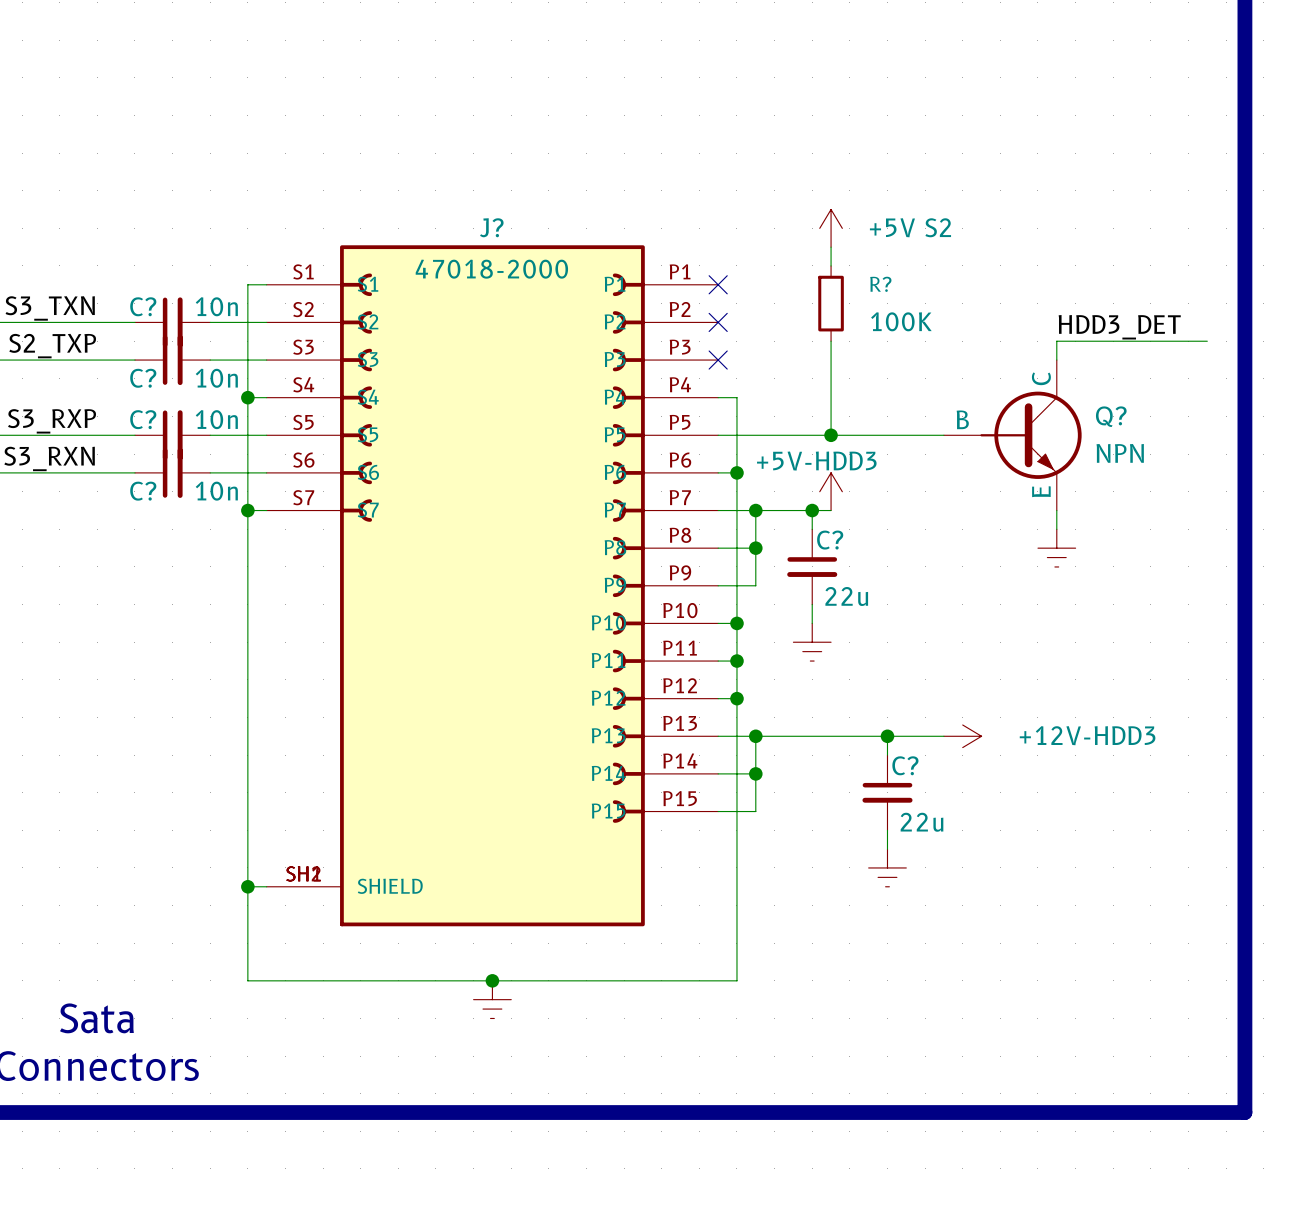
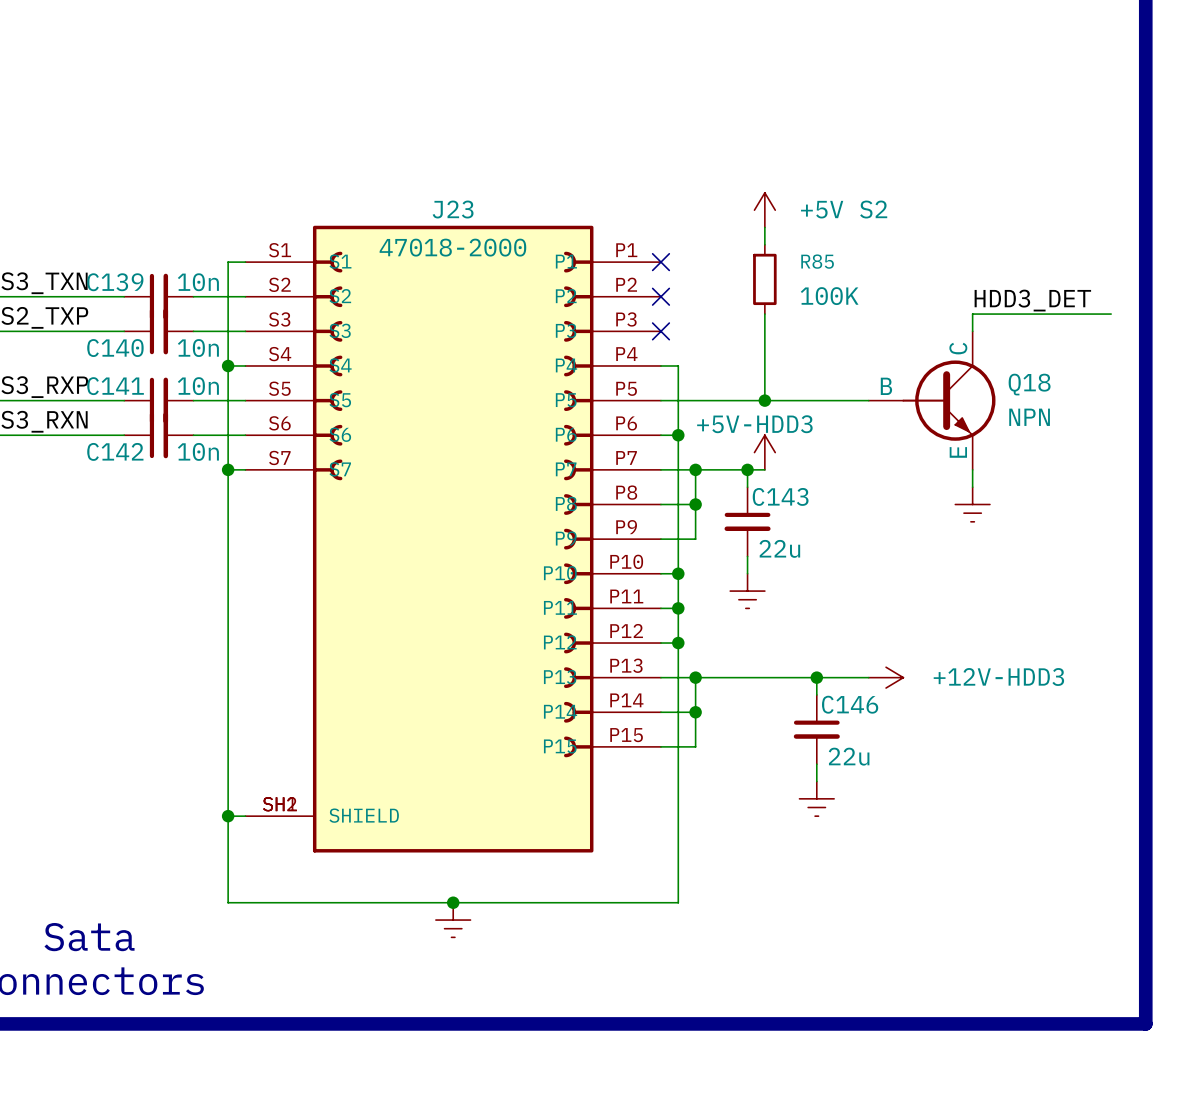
J? name: J? (491, 227) -> J23 (453, 209)
R? name: R? (880, 284) -> R85 (817, 261)
C? name: C? (143, 306) -> C139 (115, 282)
C? name: C? (143, 378) -> C140 (115, 348)
Q? name: Q? (1111, 416) -> Q18 (1029, 384)
C? name: C? (143, 419) -> C141 (115, 386)
C? name: C? (143, 491) -> C142 (115, 451)
C? name: C? (830, 540) -> C143 (780, 496)
C? name: C? (905, 765) -> C146 (850, 704)

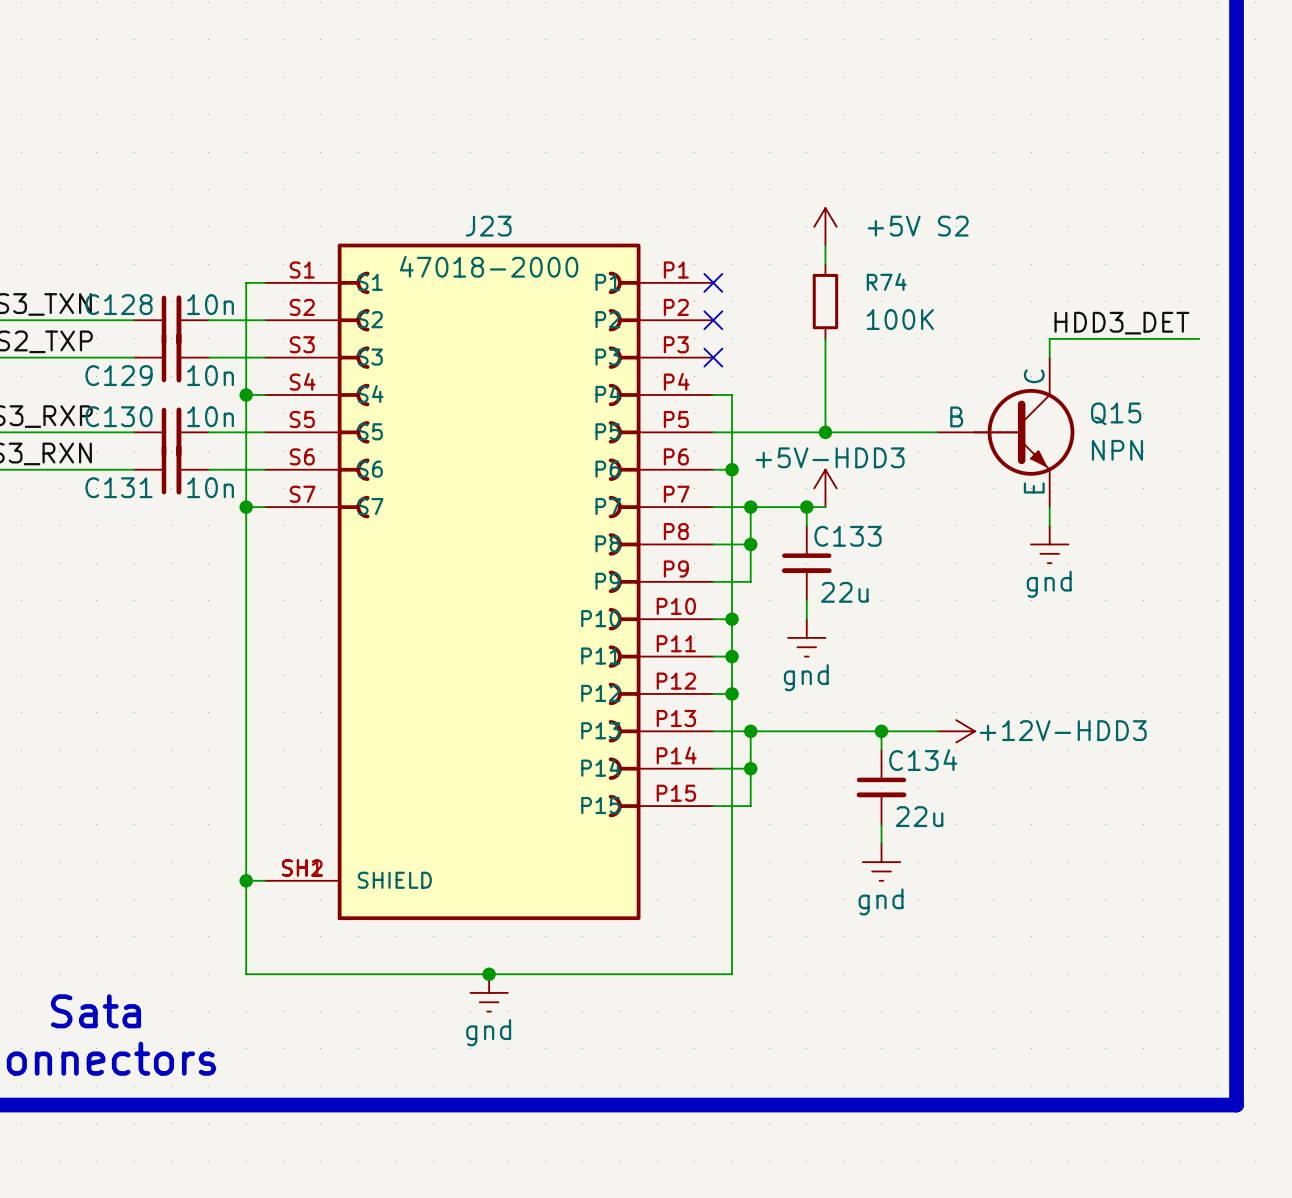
R85 name: R85 (817, 261) -> R74 (886, 281)
C139 name: C139 (115, 282) -> C128 (119, 304)
C140 name: C140 (115, 348) -> C129 (119, 375)
Q18 name: Q18 (1029, 384) -> Q15 (1116, 413)
C141 name: C141 (115, 386) -> C130 (119, 416)
C142 name: C142 (115, 451) -> C131 (119, 487)
C143 name: C143 (780, 496) -> C133 (848, 536)
power symbol text: none -> gnd (1049, 584)
power symbol text: none -> gnd (806, 677)
C146 name: C146 (850, 704) -> C134 (923, 760)
power symbol text: none -> gnd (881, 901)
power symbol text: none -> gnd (488, 1032)

